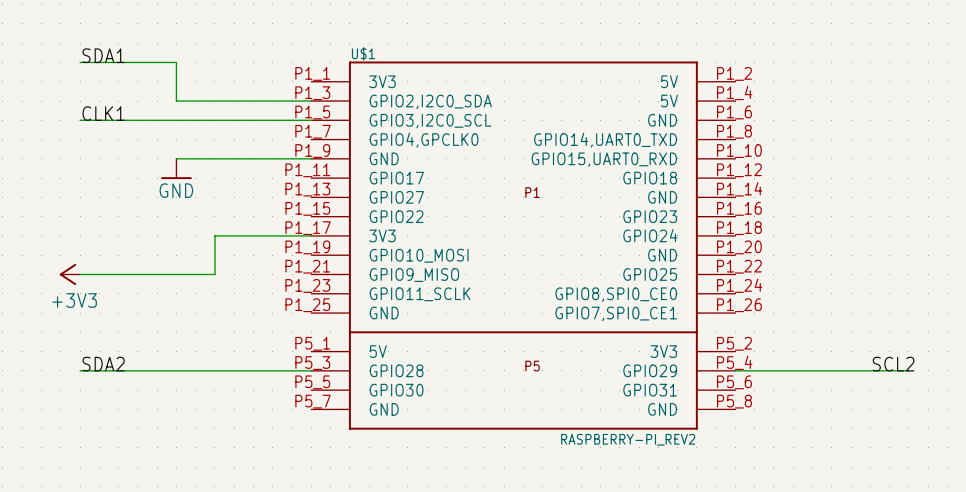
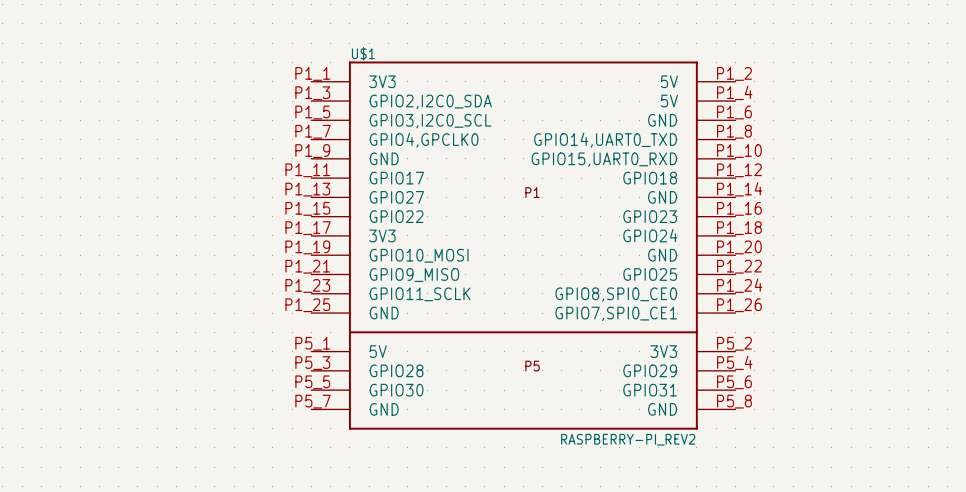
label: SDA1 (103, 55) -> none
wire: (80, 62) (176, 62) (176, 101) (311, 101) -> none
label: CLK1 (103, 113) -> none
wire: (80, 120) (311, 120) -> none
wire: (176, 158) (311, 158) -> none
power symbol: GND (176, 168) -> none
wire: (311, 235) (214, 235) (214, 274) (80, 274) -> none
power symbol: +3V3 (69, 274) -> none
label: SDA2 (103, 364) -> none
label: SCL2 (893, 364) -> none
wire: (80, 370) (311, 370) -> none
wire: (735, 370) (908, 370) -> none

